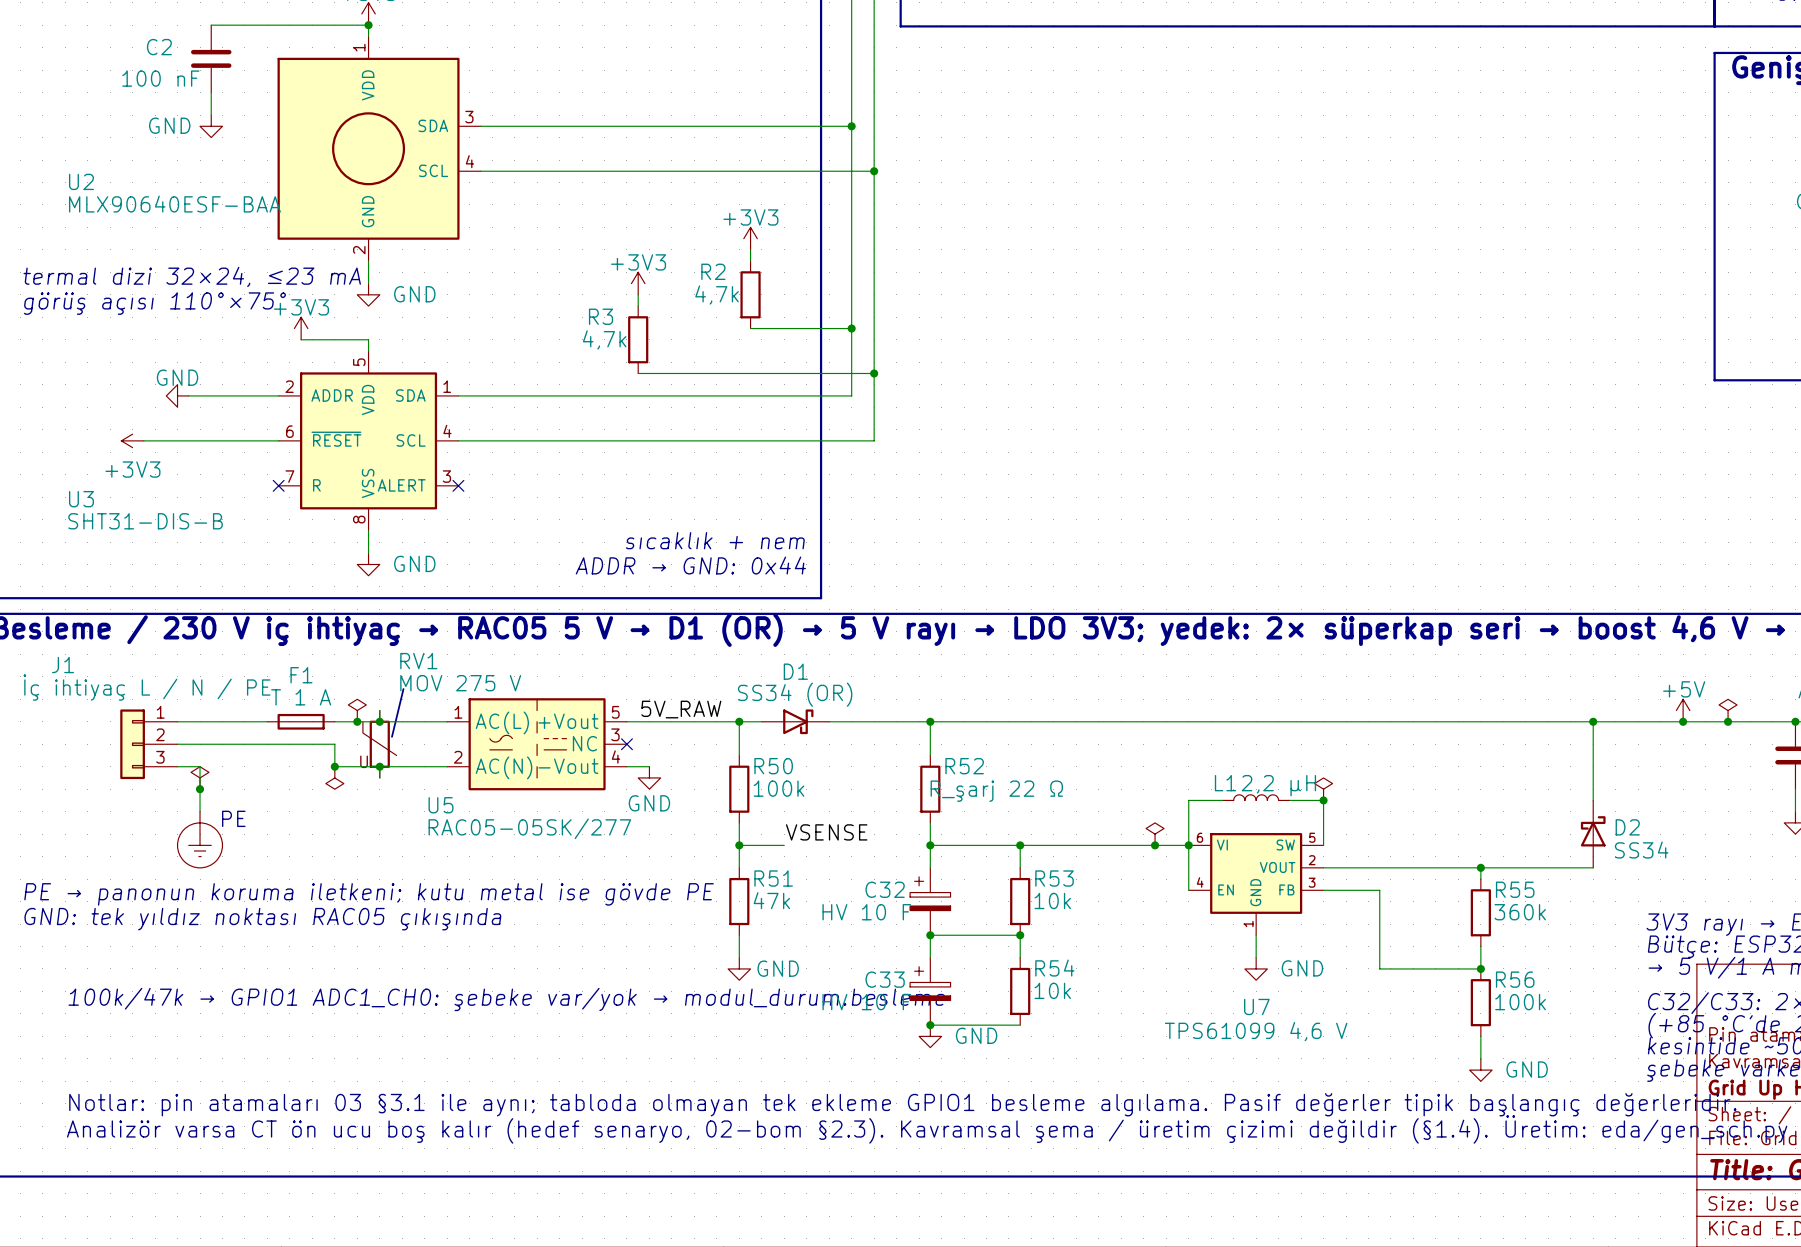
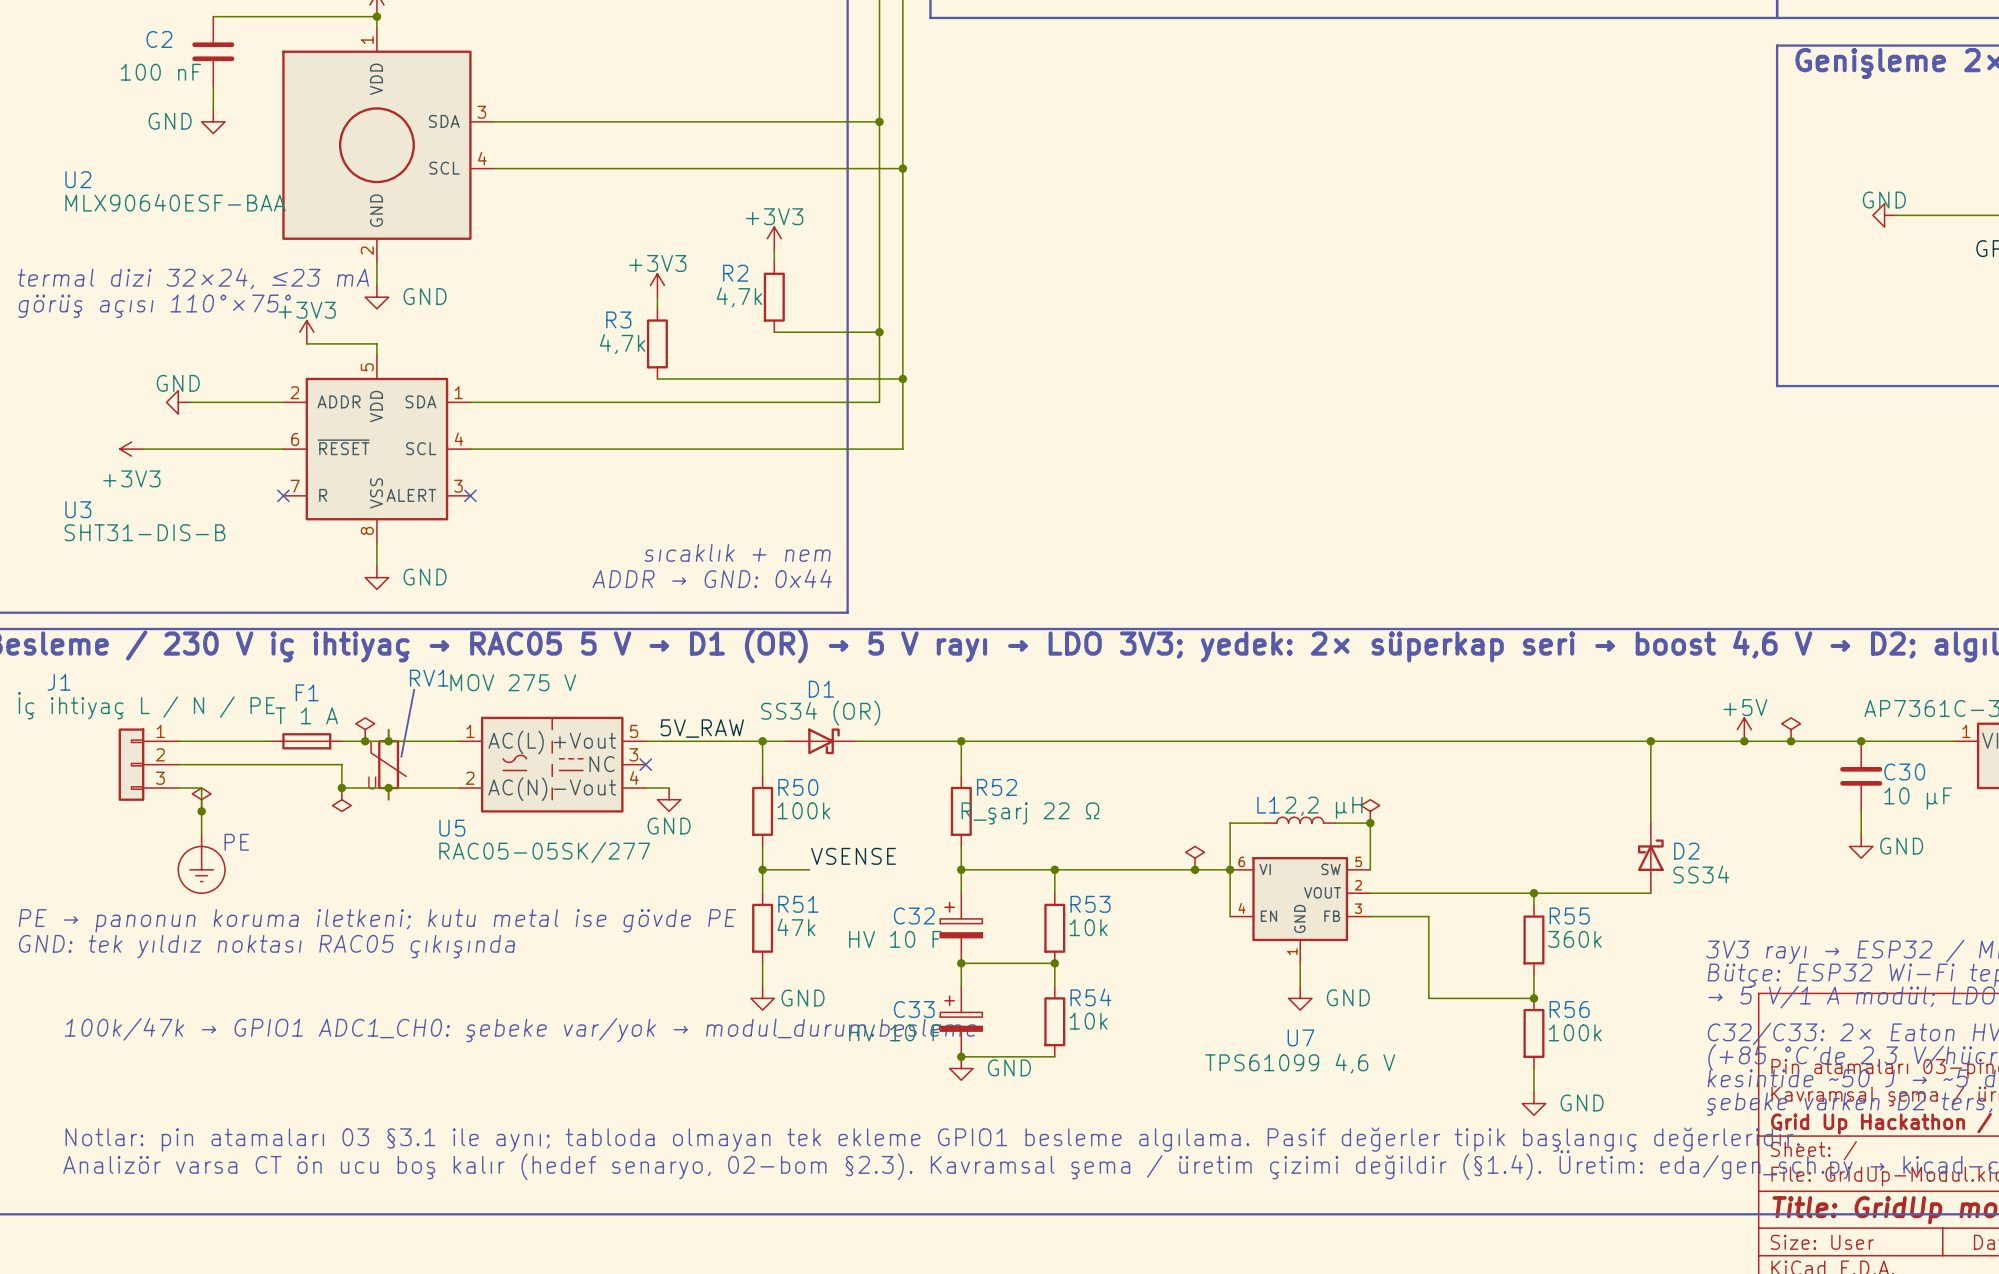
RV1 value position: MOV 275 V (460, 683) -> MOV 275 V (513, 682)
line: (403, 689) (391, 736) -> (414, 689) (401, 756)

